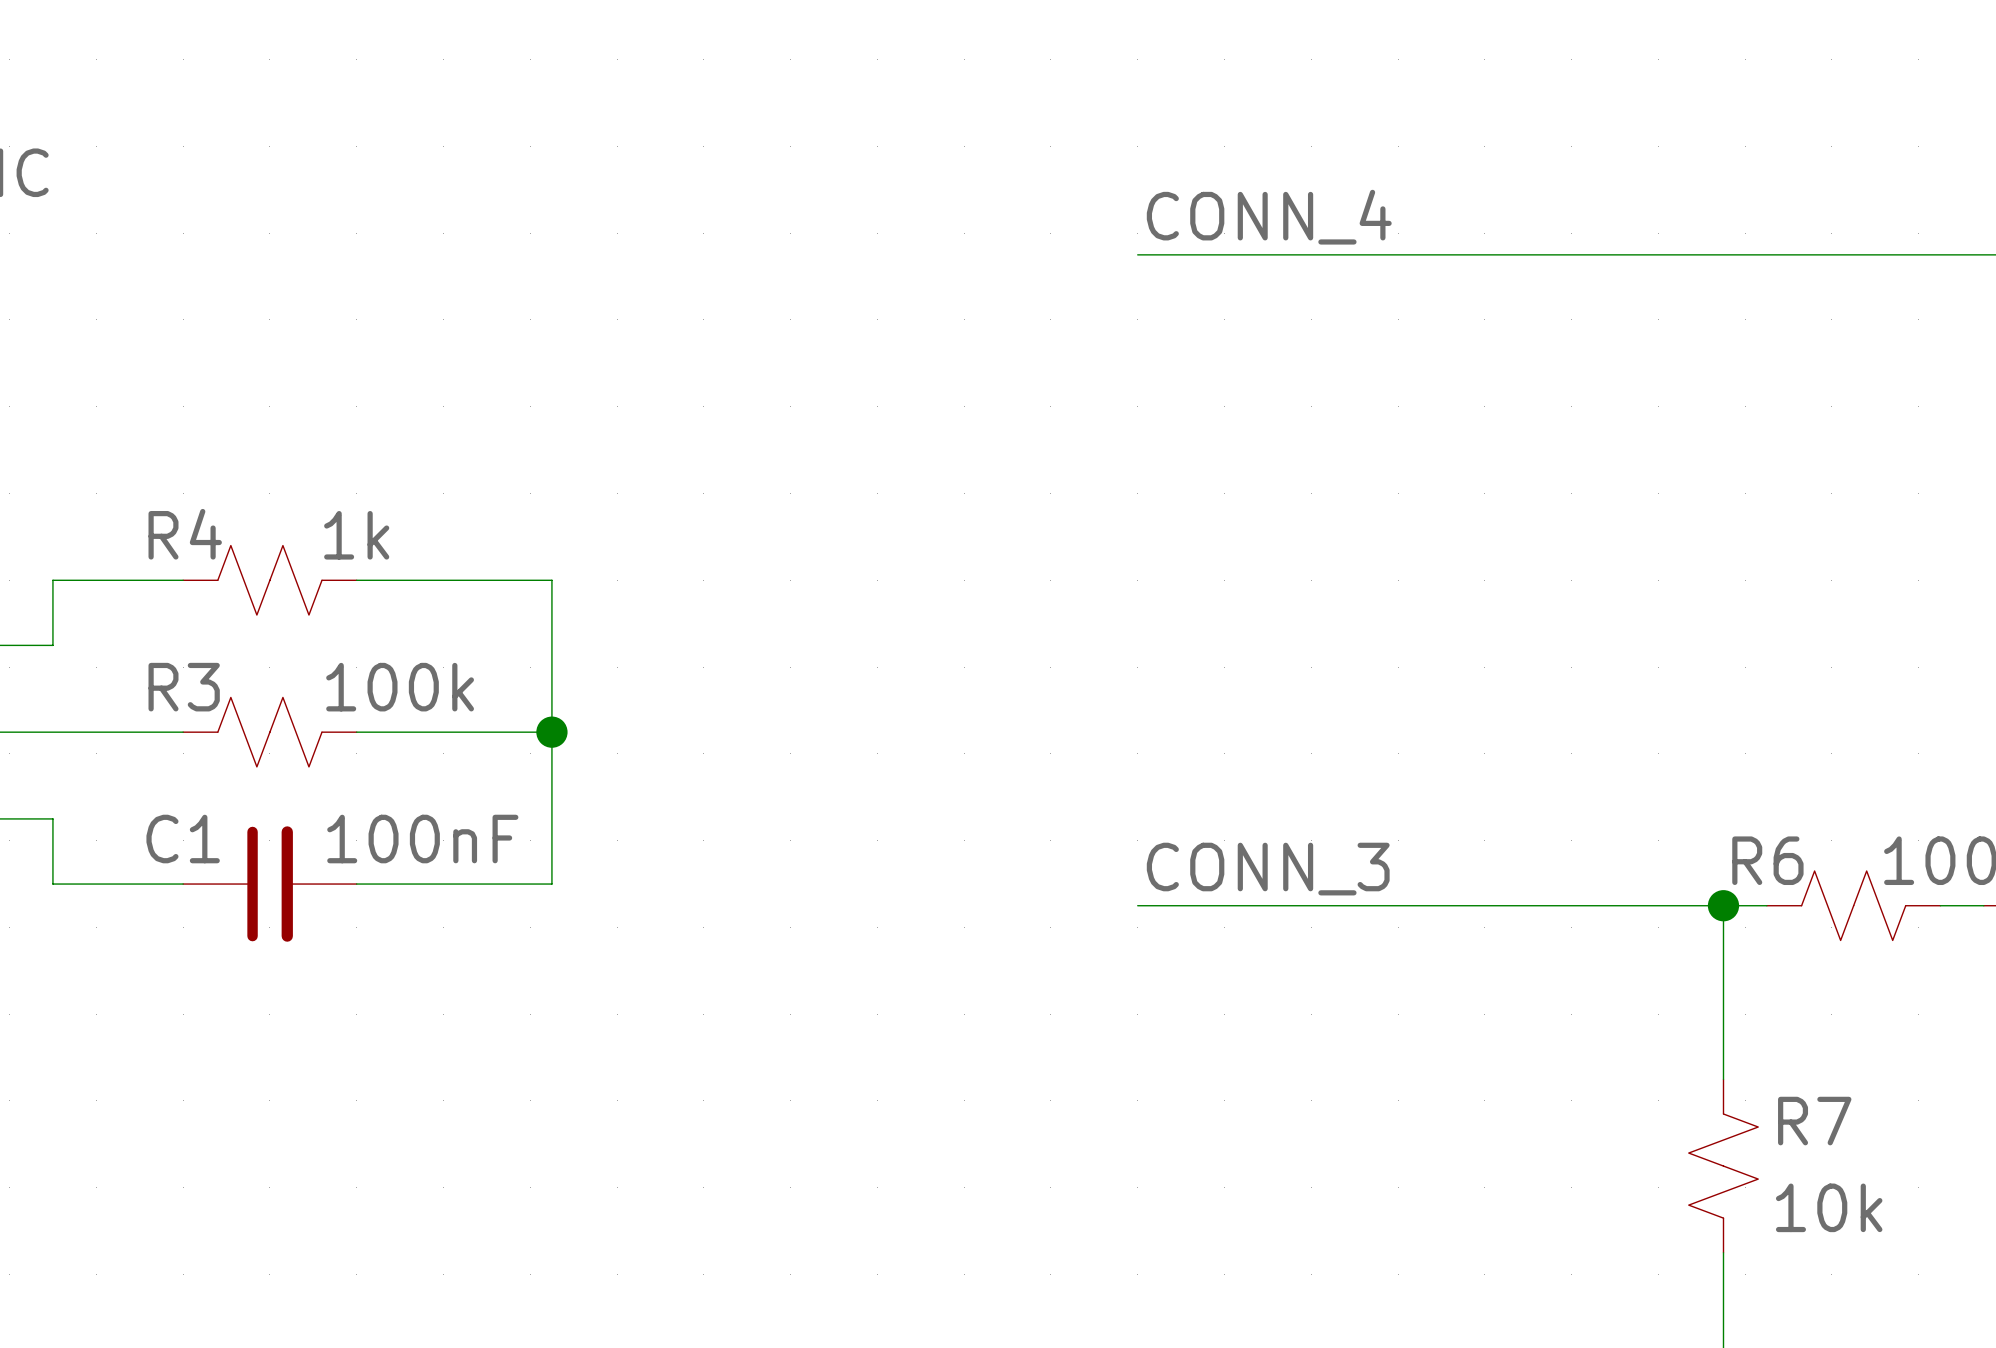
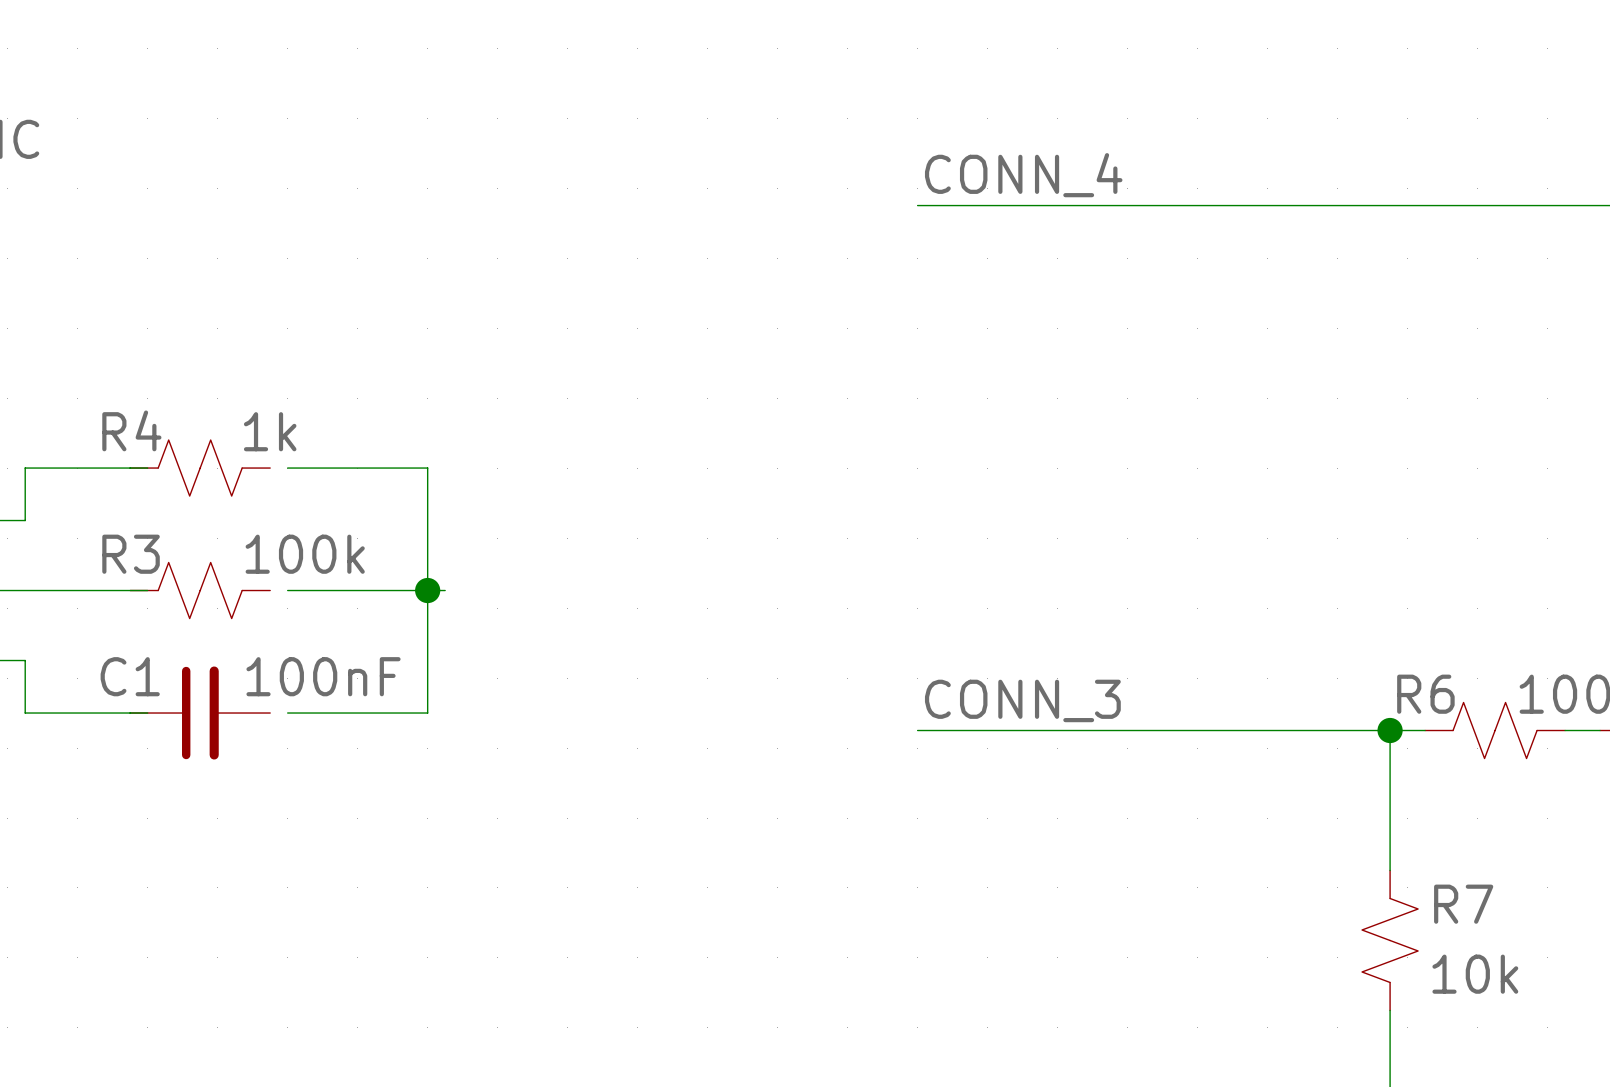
wire: (52, 580) (52, 645) (31, 645) -> (42, 468) (25, 468) (25, 520)
R4 position: (269, 580) -> (200, 468)
wire: (530, 580) (551, 580) (551, 884) (530, 884) -> (427, 468) (427, 713)
R3 position: (269, 732) -> (200, 590)
junction position: (551, 732) -> (427, 590)
wire: (31, 818) (52, 818) (52, 884) -> (25, 660) (25, 713) (42, 713)
C1 position: (269, 884) -> (200, 713)

